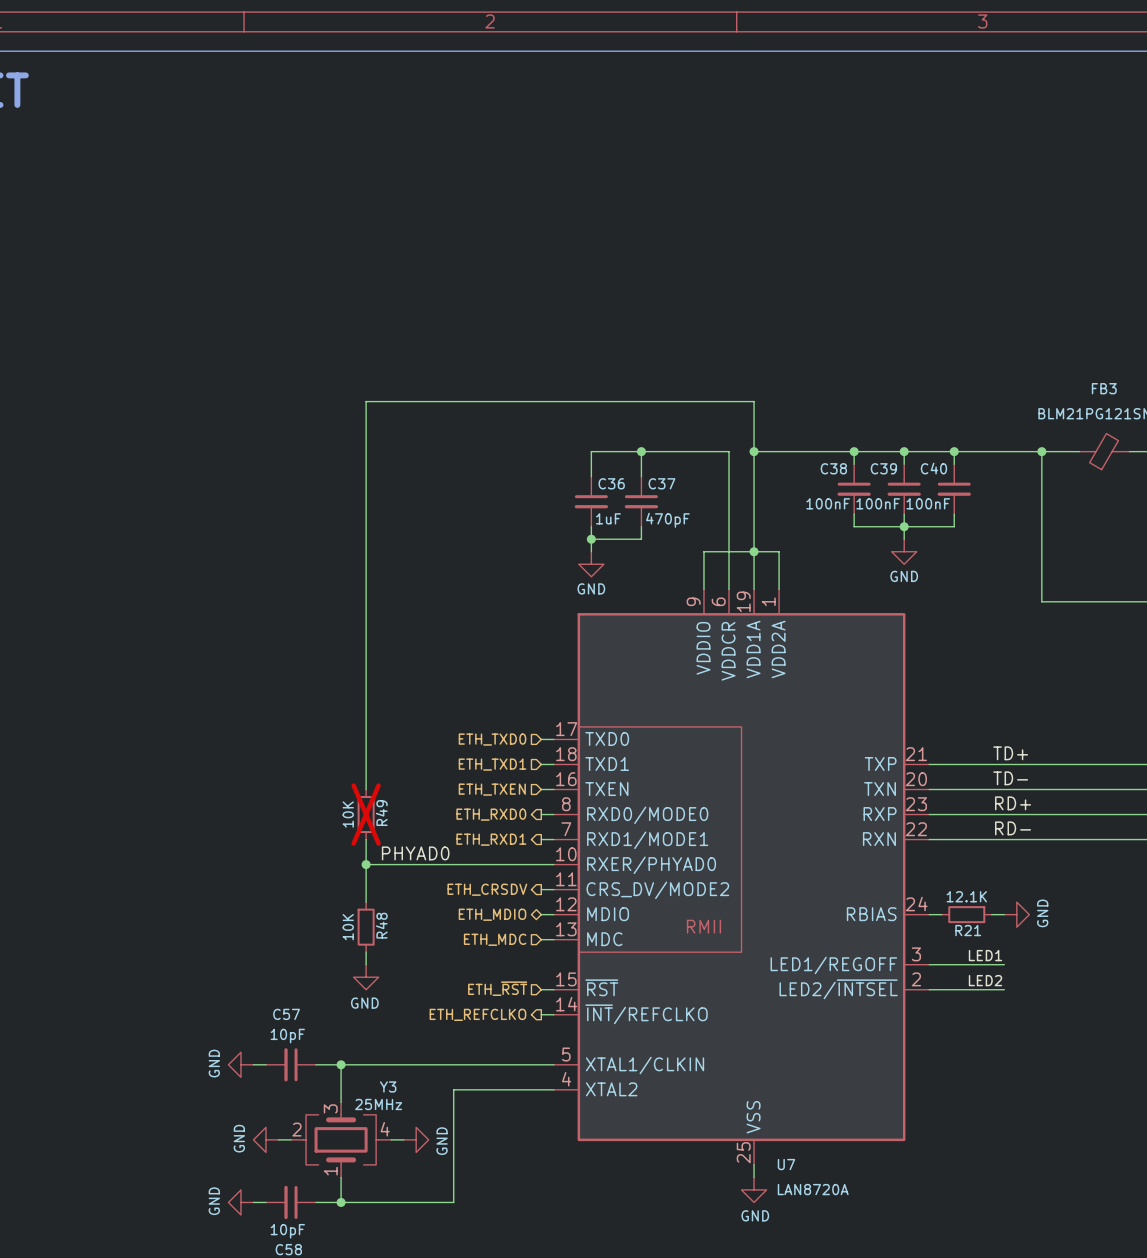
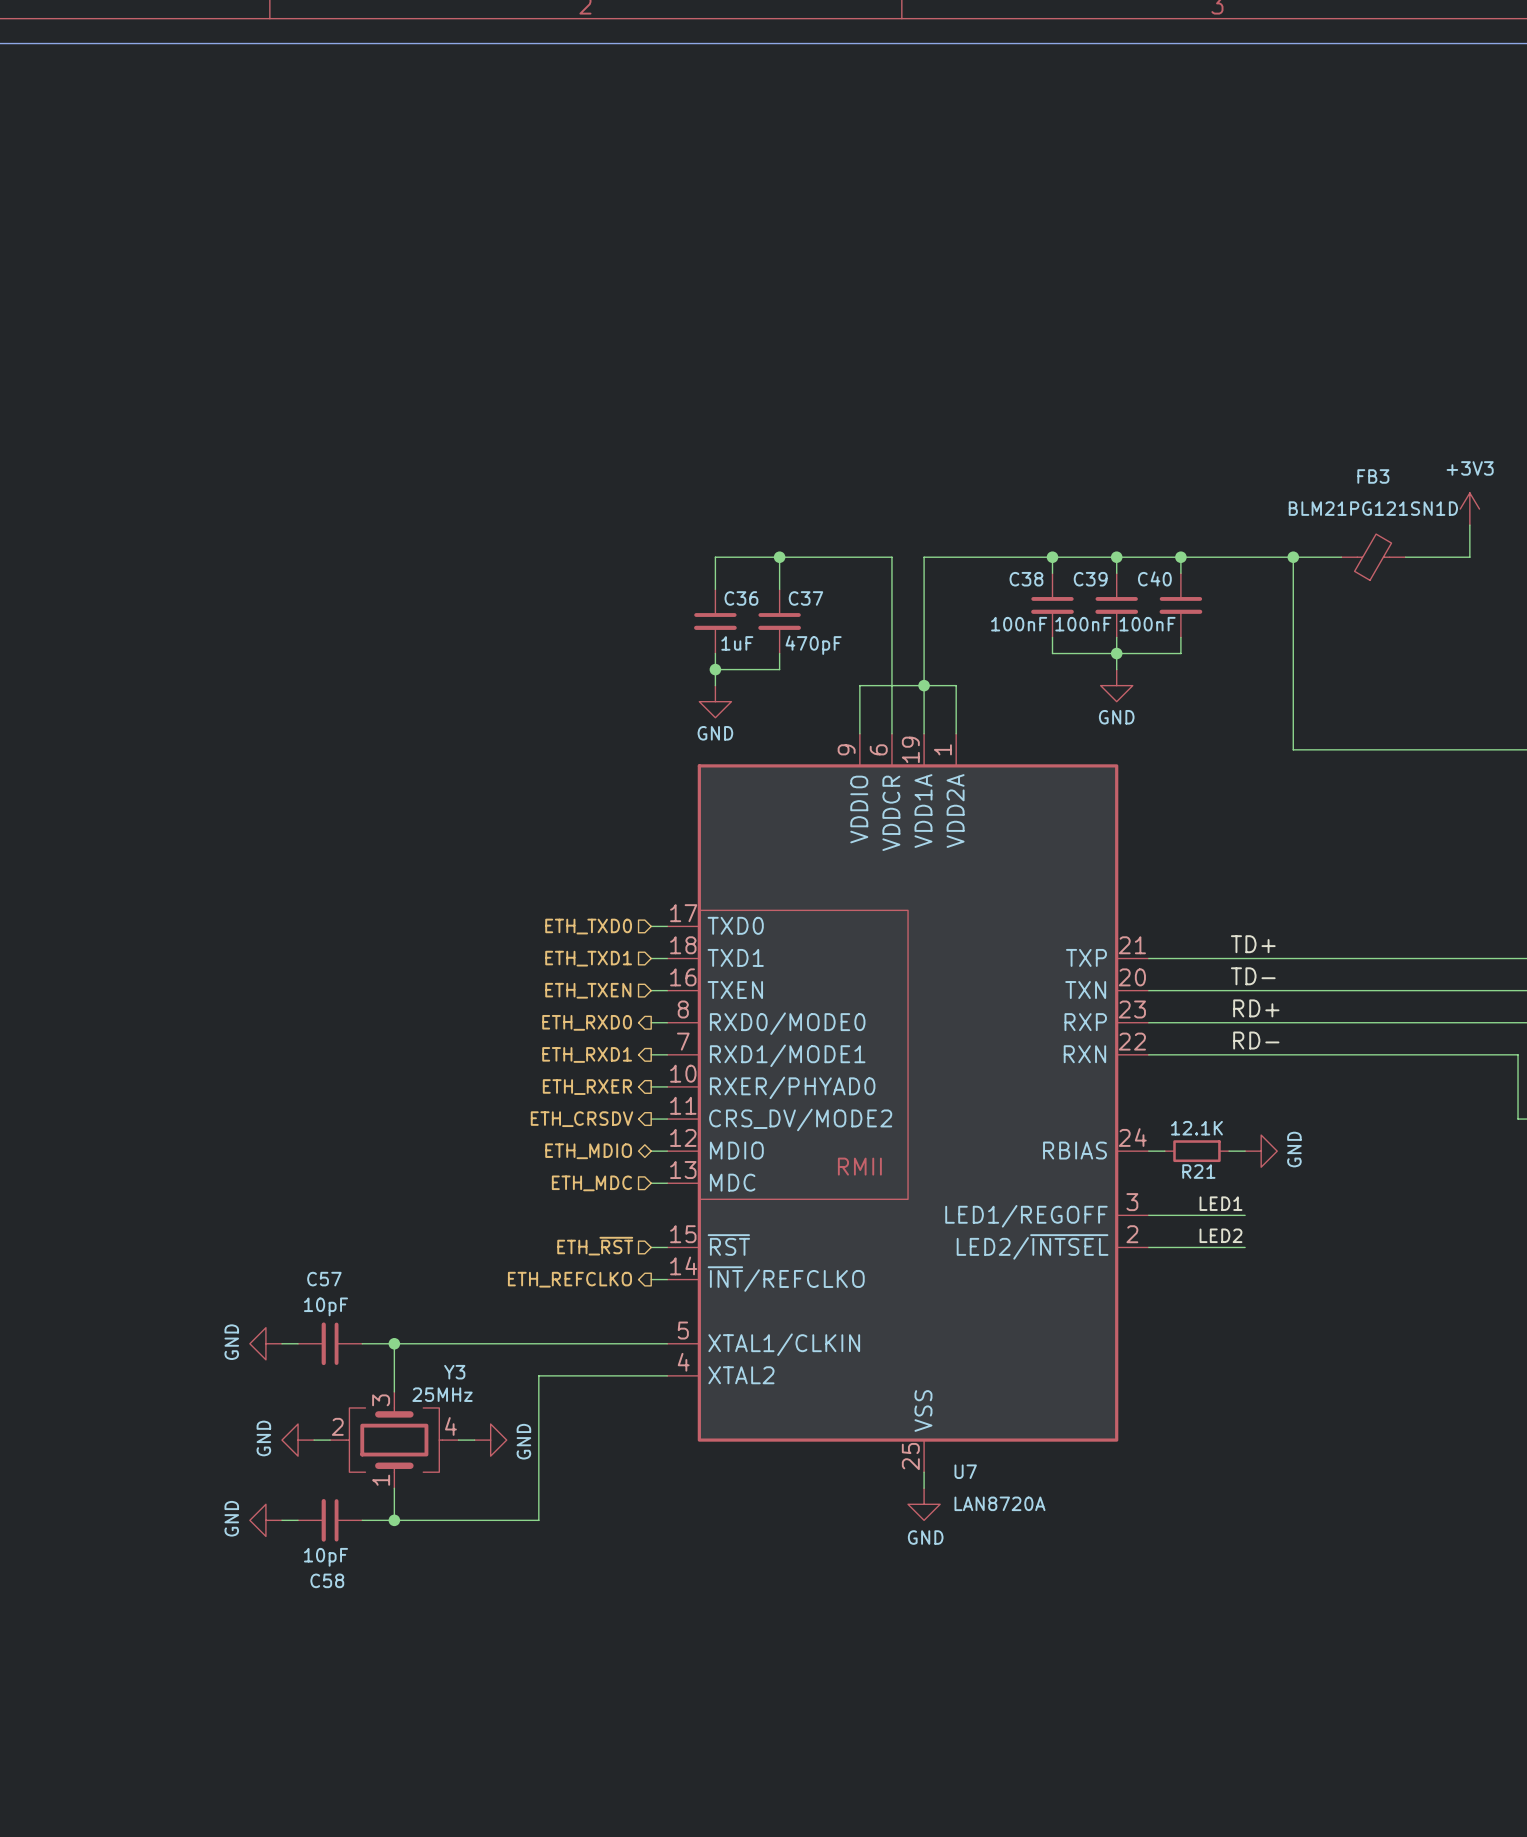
wire: (754, 451) (754, 401) (366, 401) (366, 789) -> none
junction: (754, 451) -> none
R49: 10K (366, 814) -> none
wire: (366, 839) (366, 902) -> none
label: PHYAD0 (415, 853) -> none
wire: (366, 864) (541, 864) -> none
junction: (366, 864) -> none
hierarchical label: none -> ETH_RXER (587, 1087)
R48: 10K (366, 927) -> none
wire: (366, 952) (366, 964) -> none
power symbol: GND (366, 977) -> none

